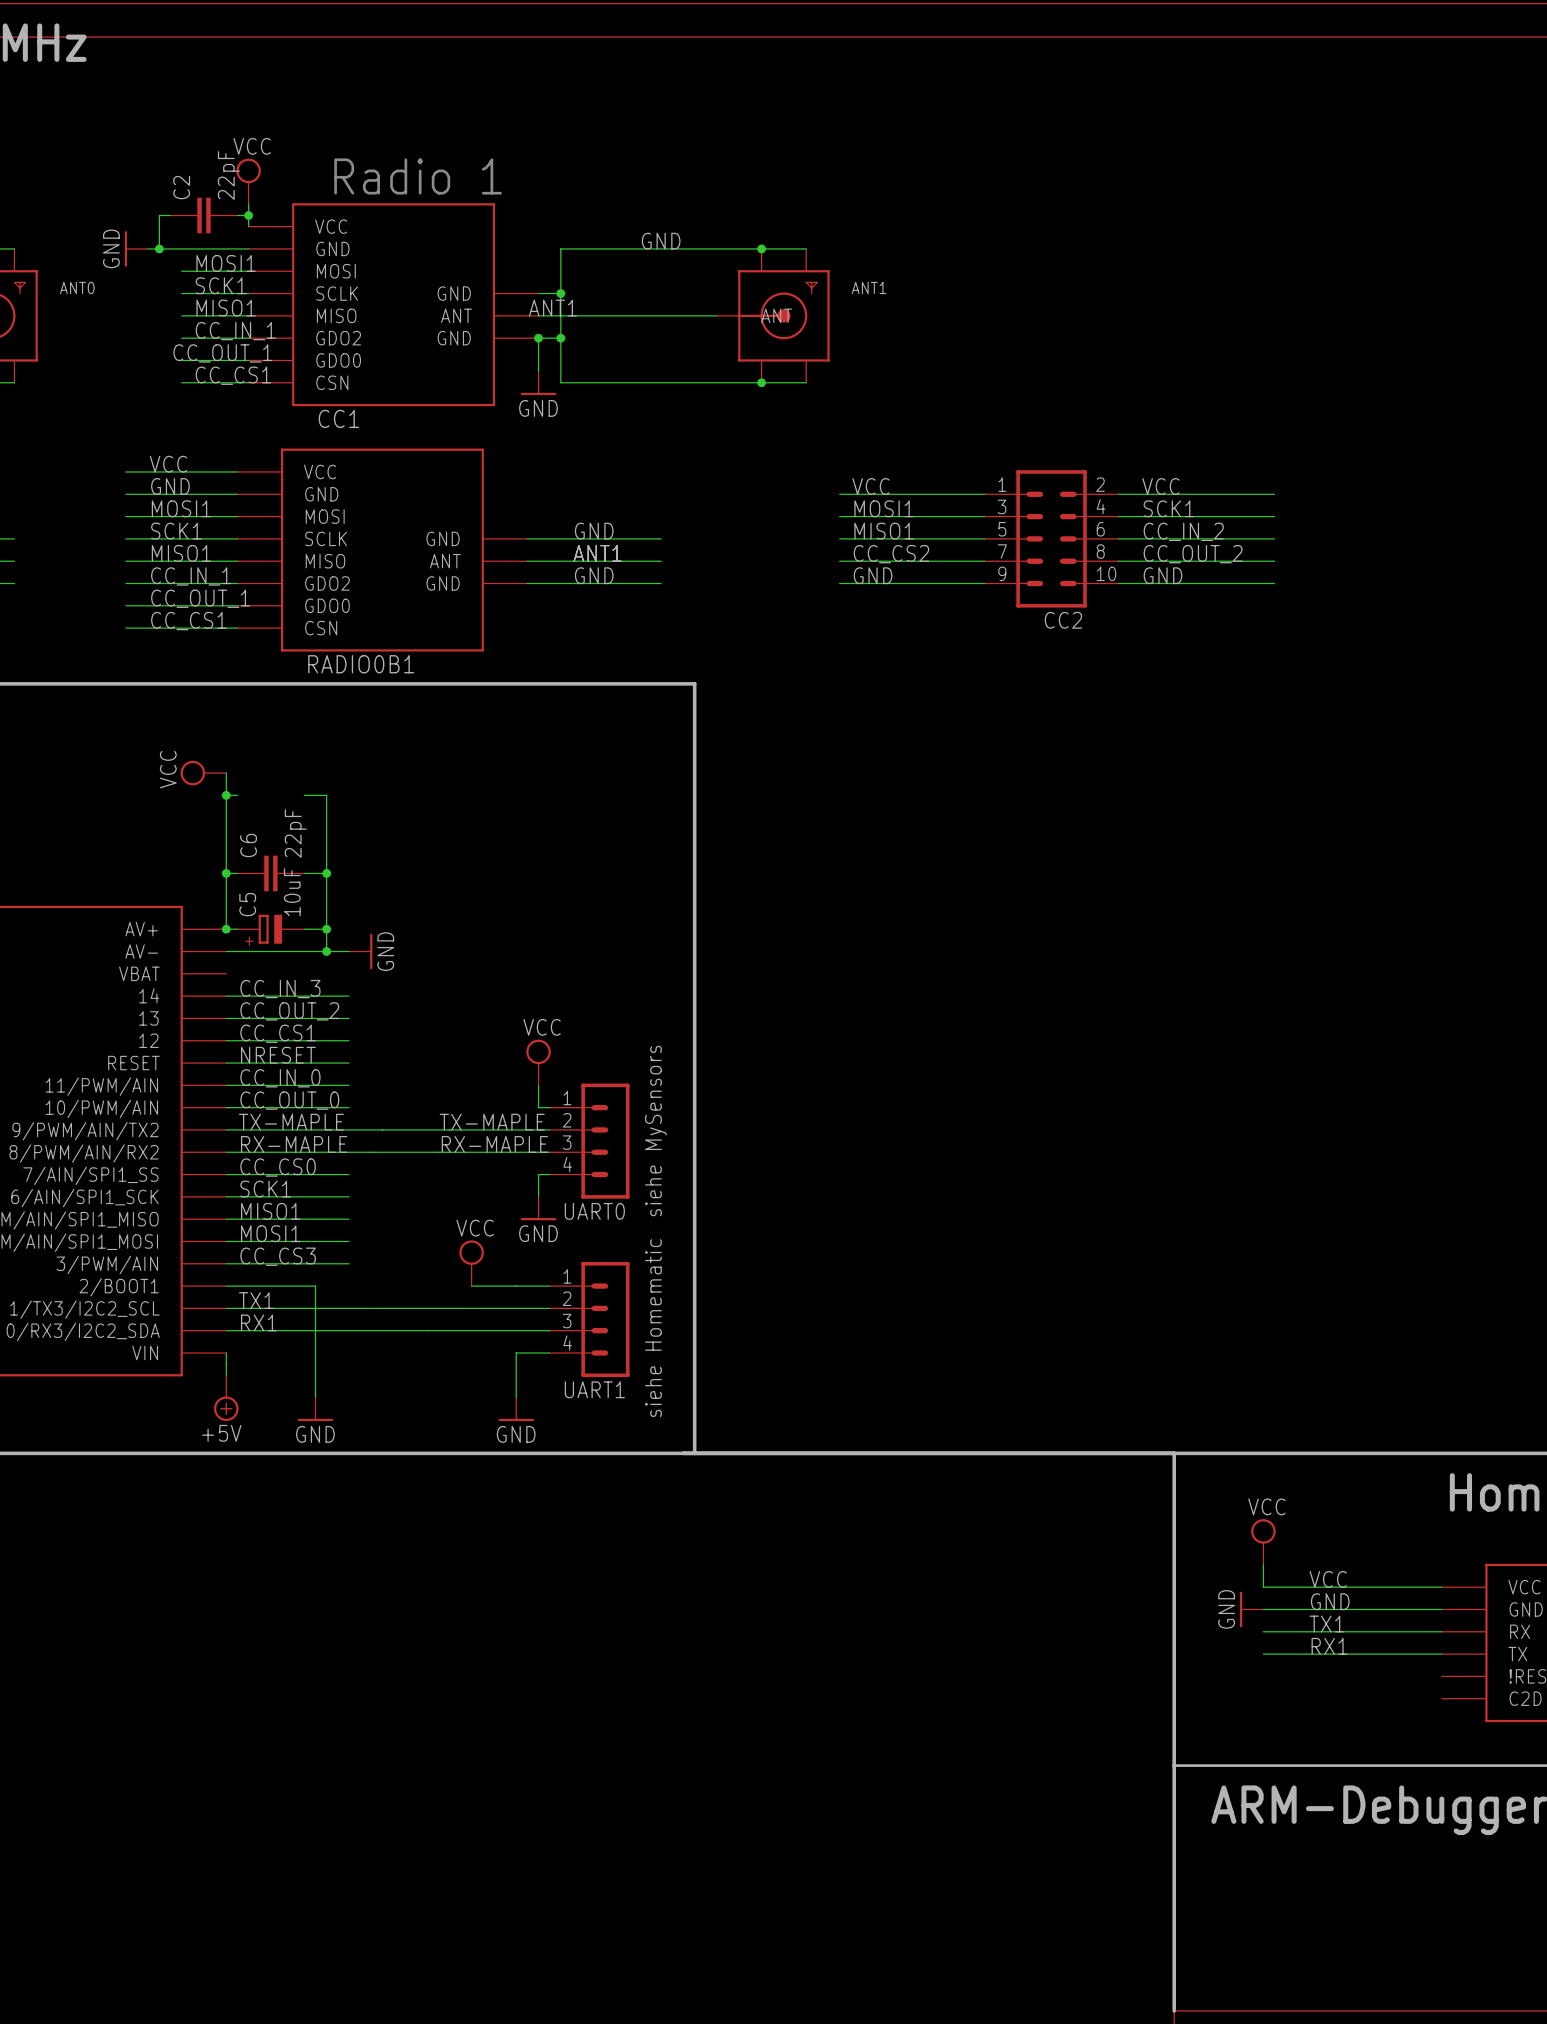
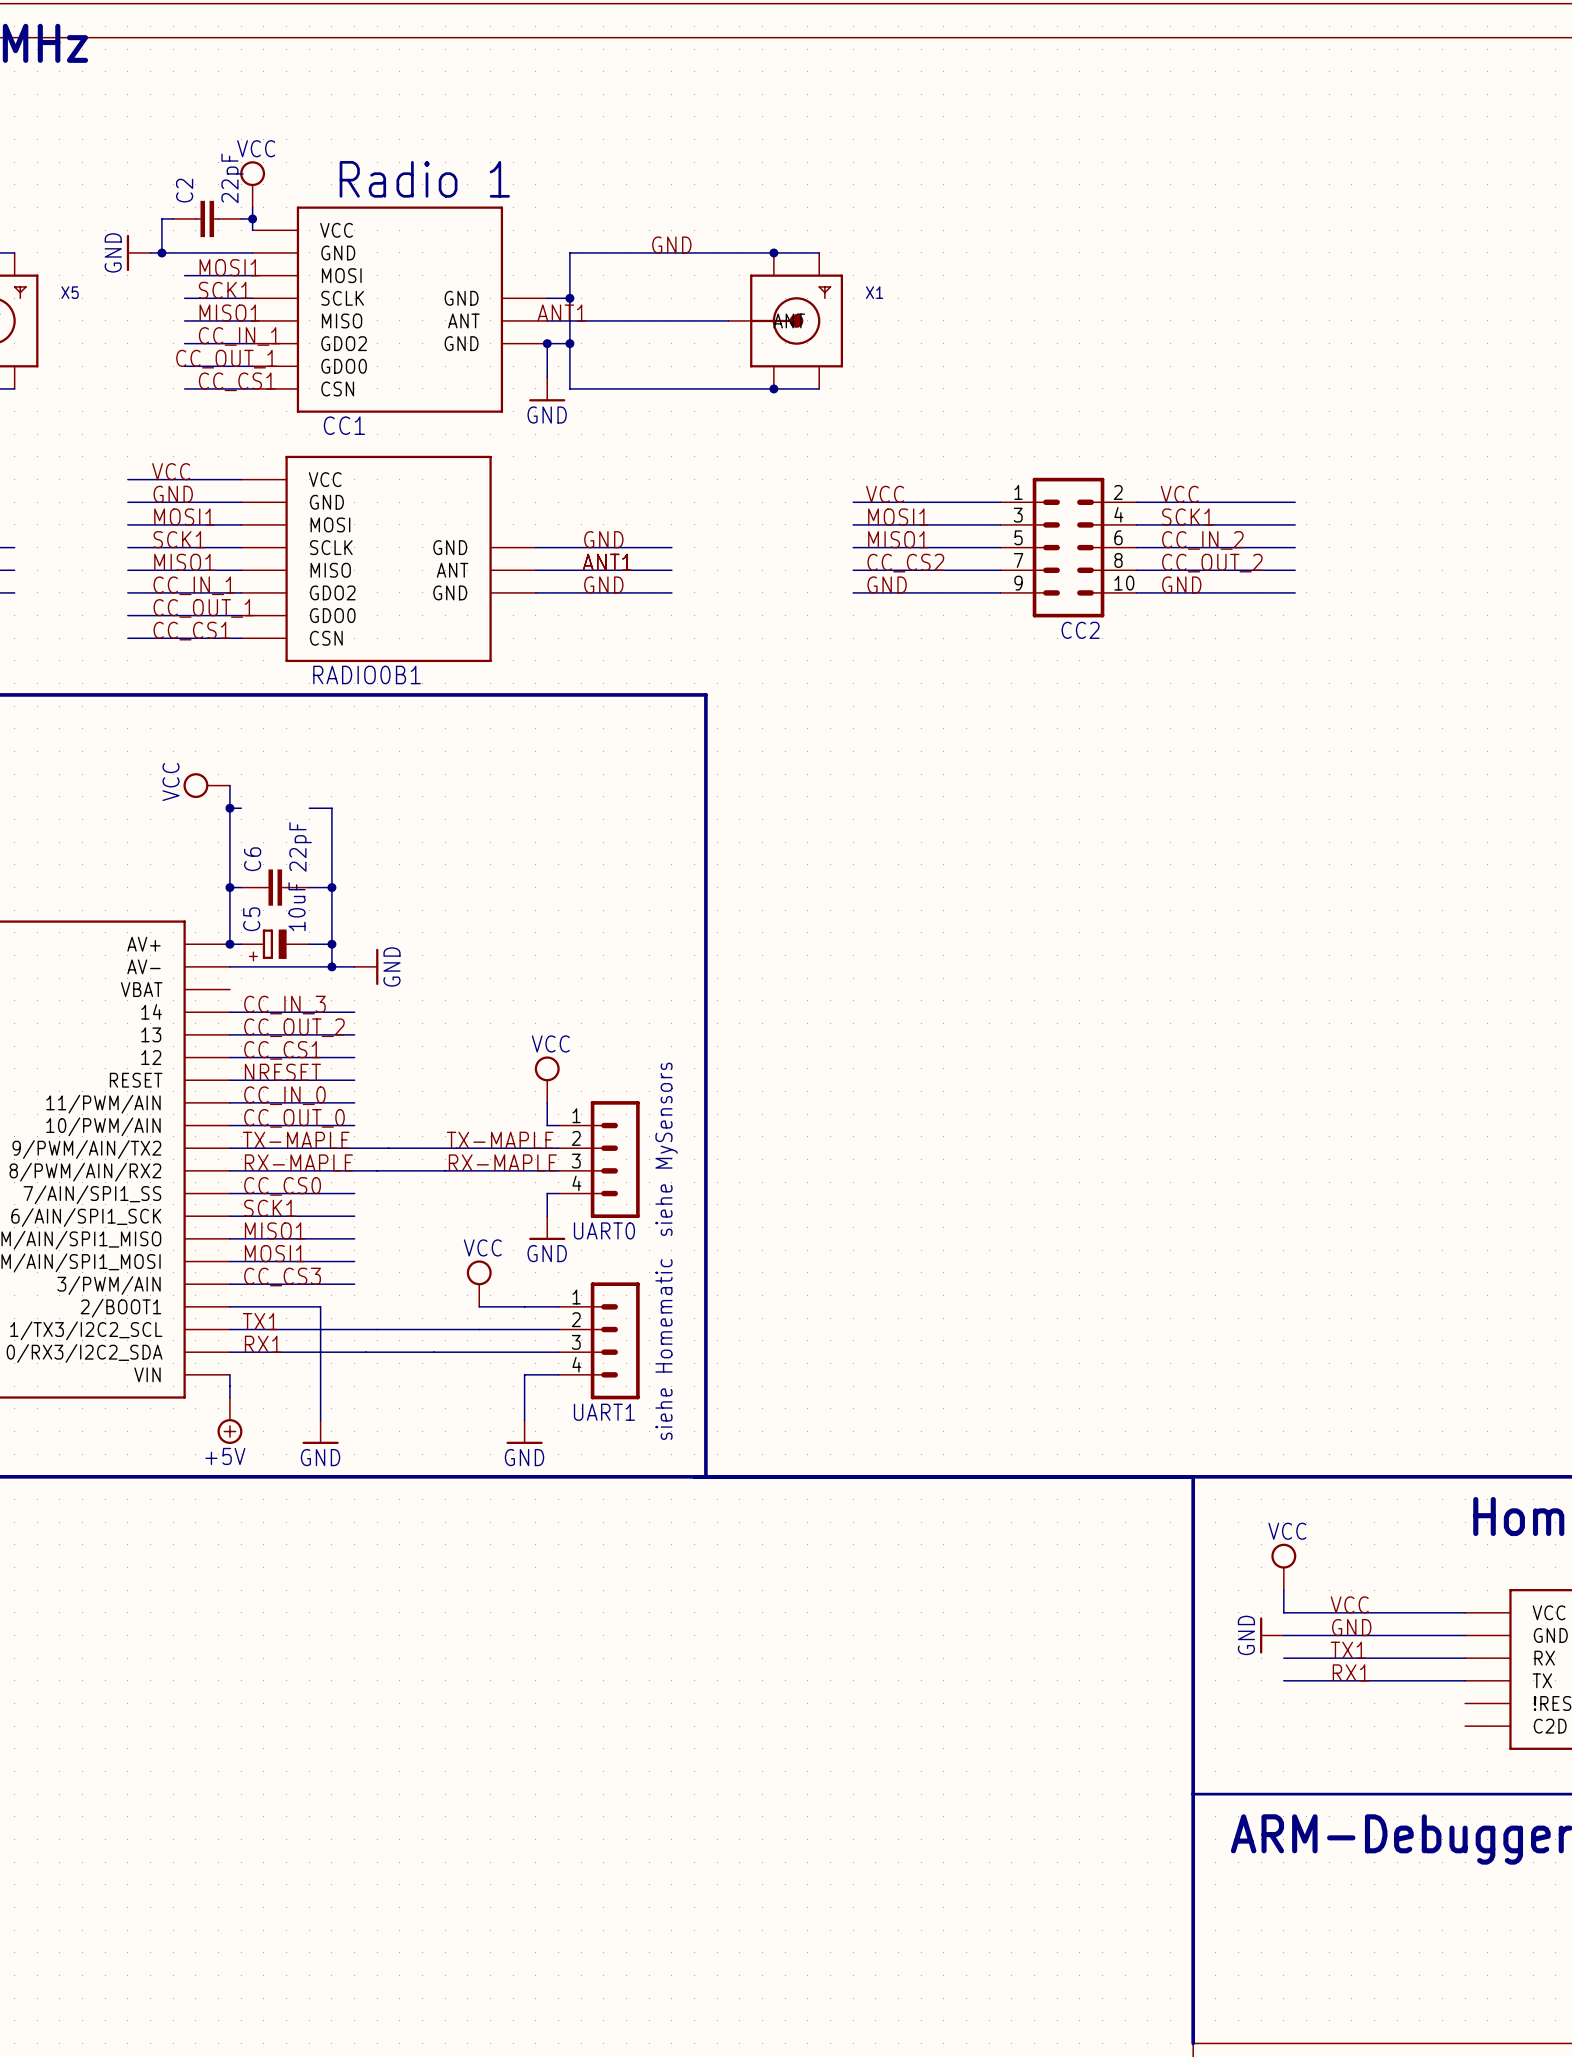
ANT0 name: ANT0 (77, 287) -> X5 (70, 292)
ANT1 name: ANT1 (869, 287) -> X1 (874, 292)

